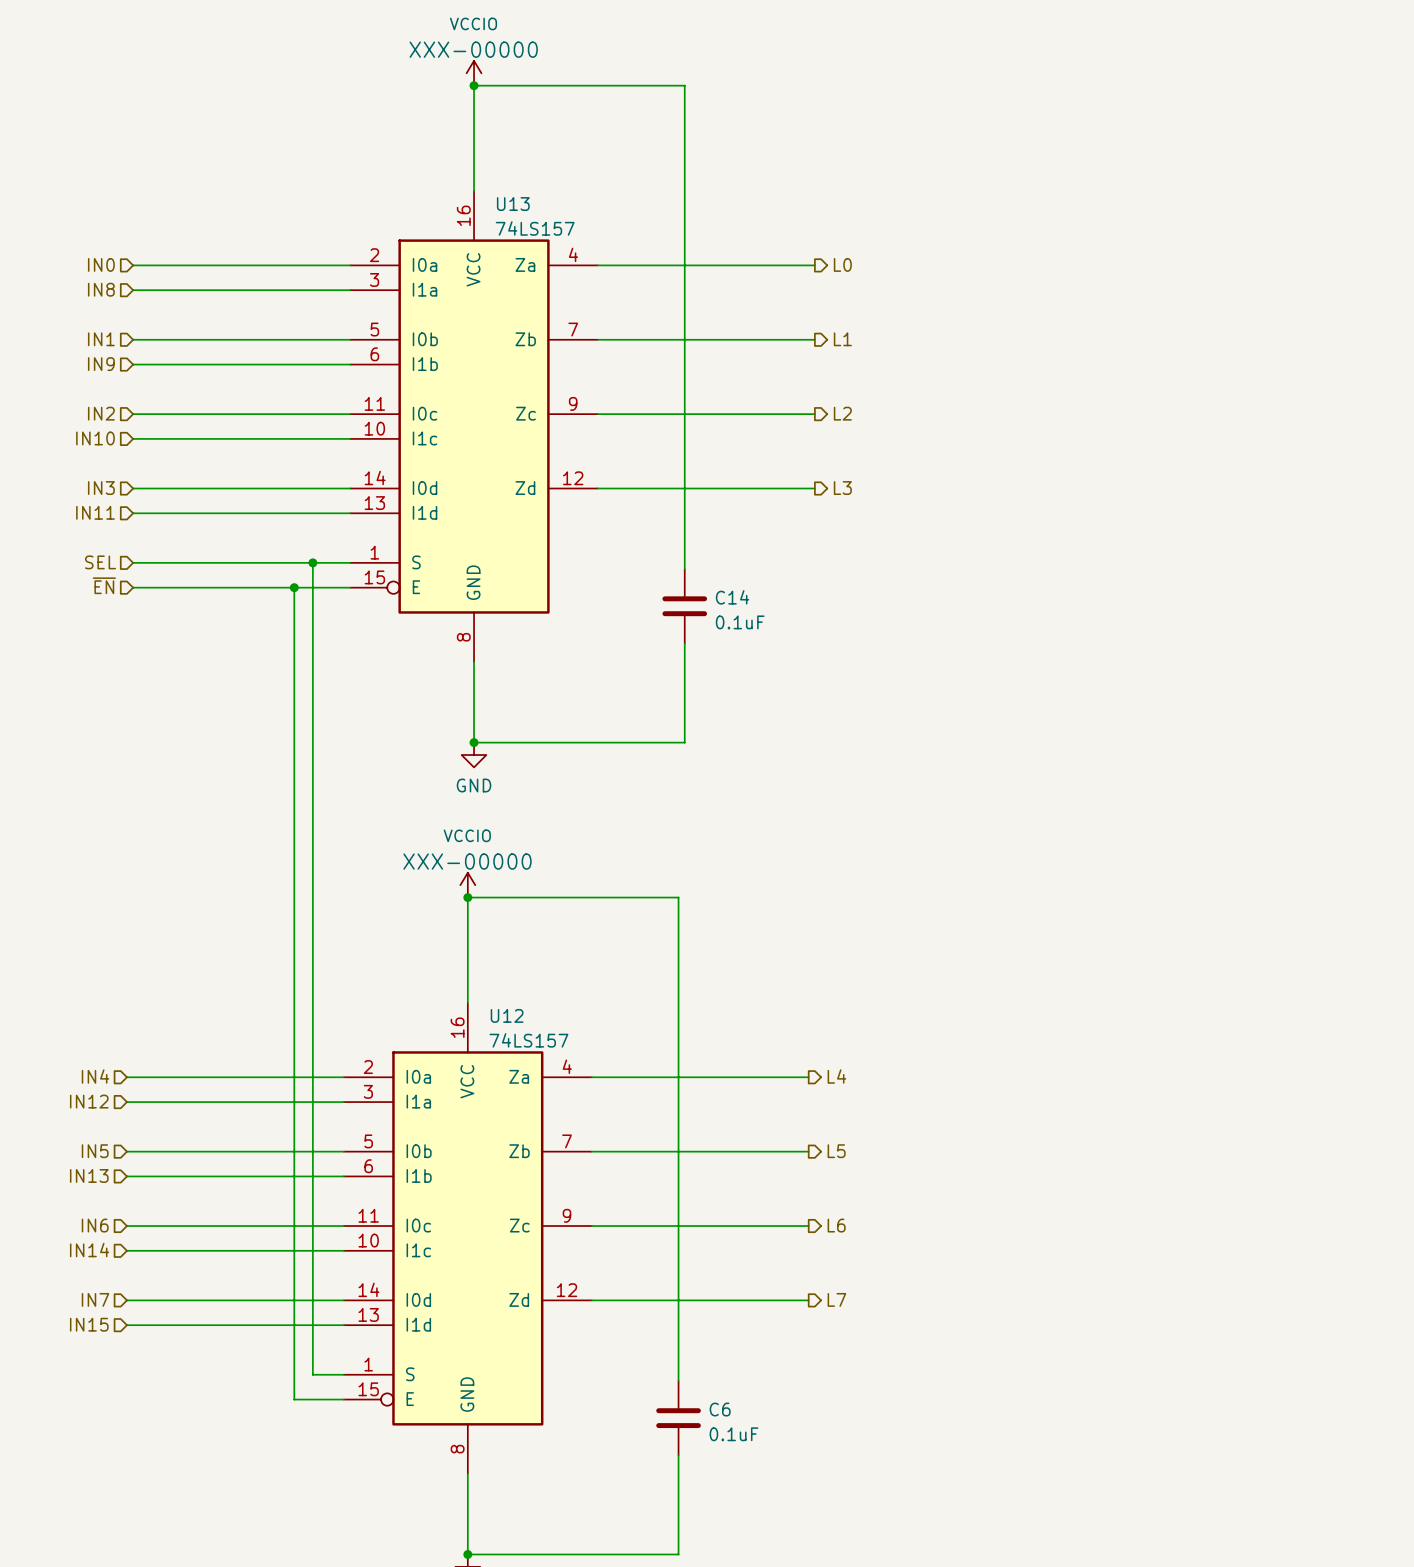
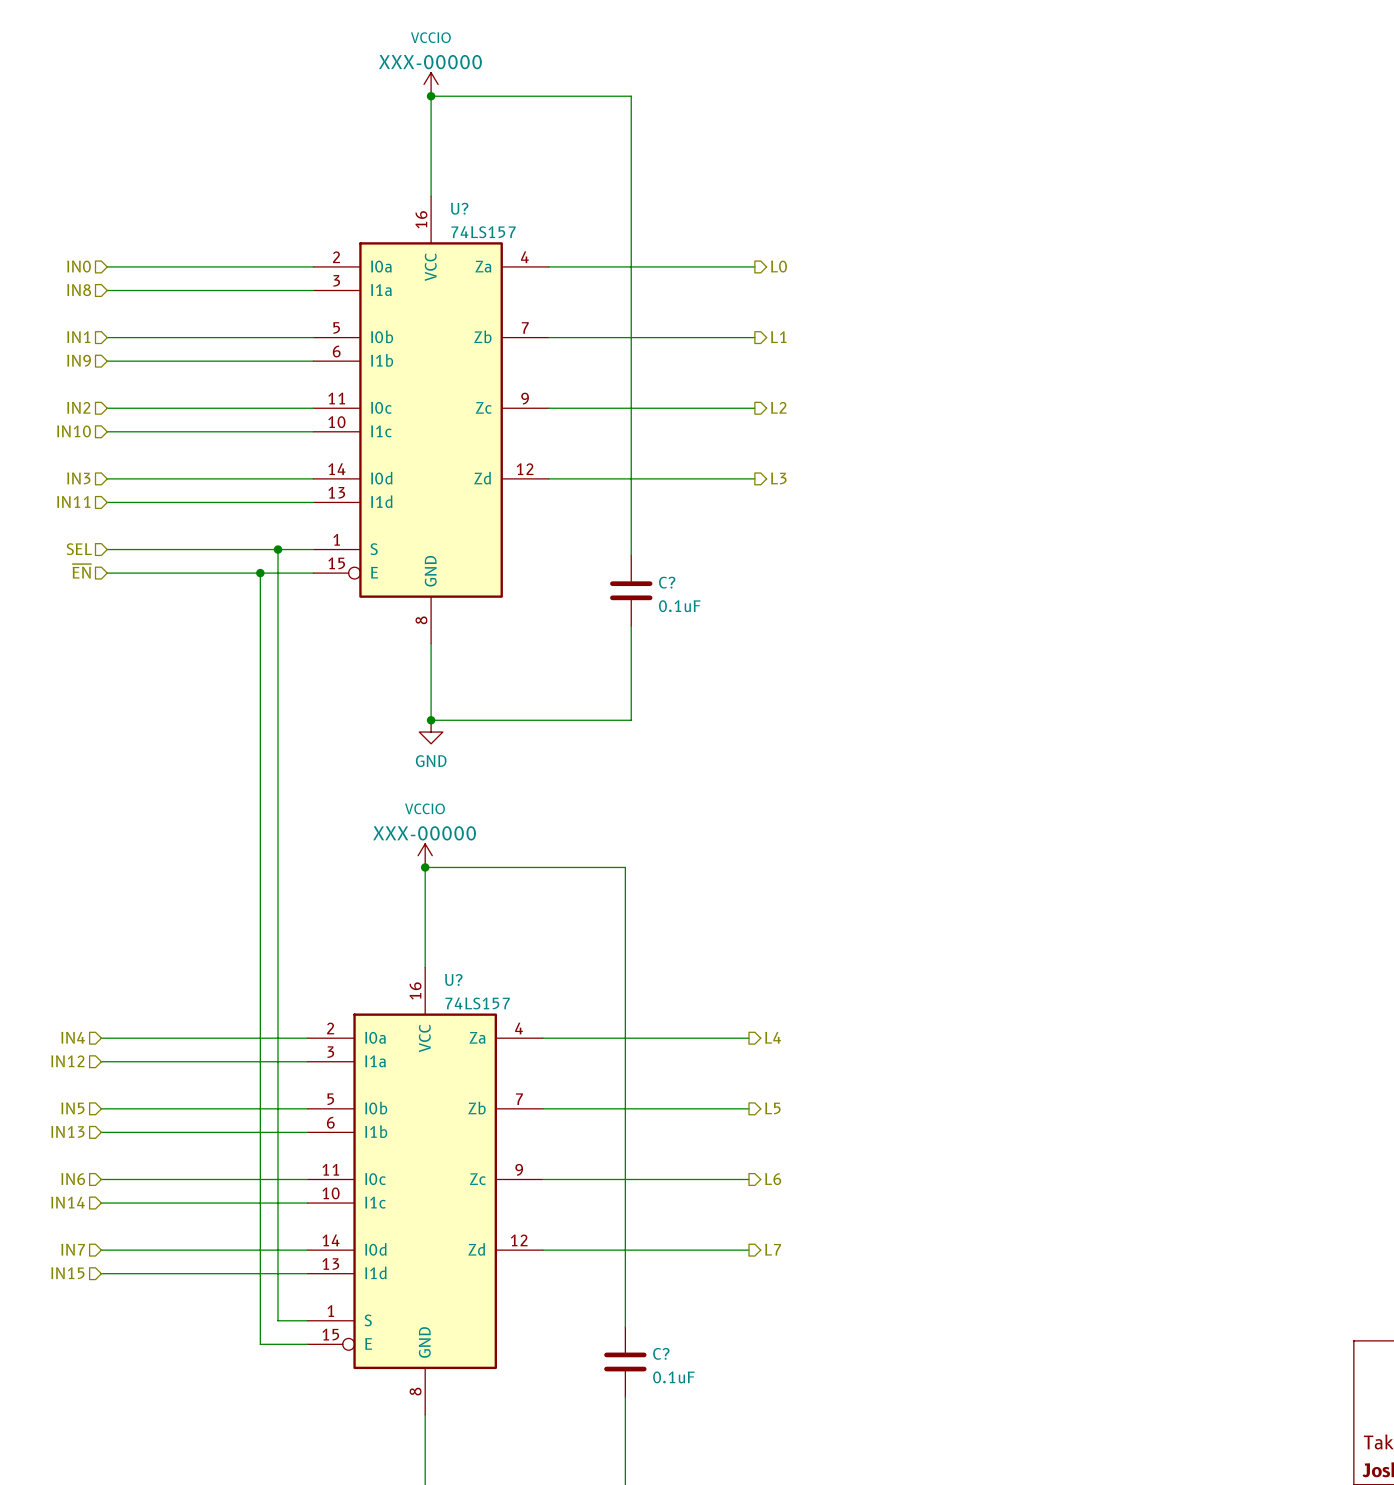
U13 name: U13 (513, 204) -> U? (459, 208)
C14 name: C14 (732, 597) -> C? (667, 582)
U12 name: U12 (507, 1015) -> U? (453, 979)
C6 name: C6 (720, 1409) -> C? (661, 1353)

